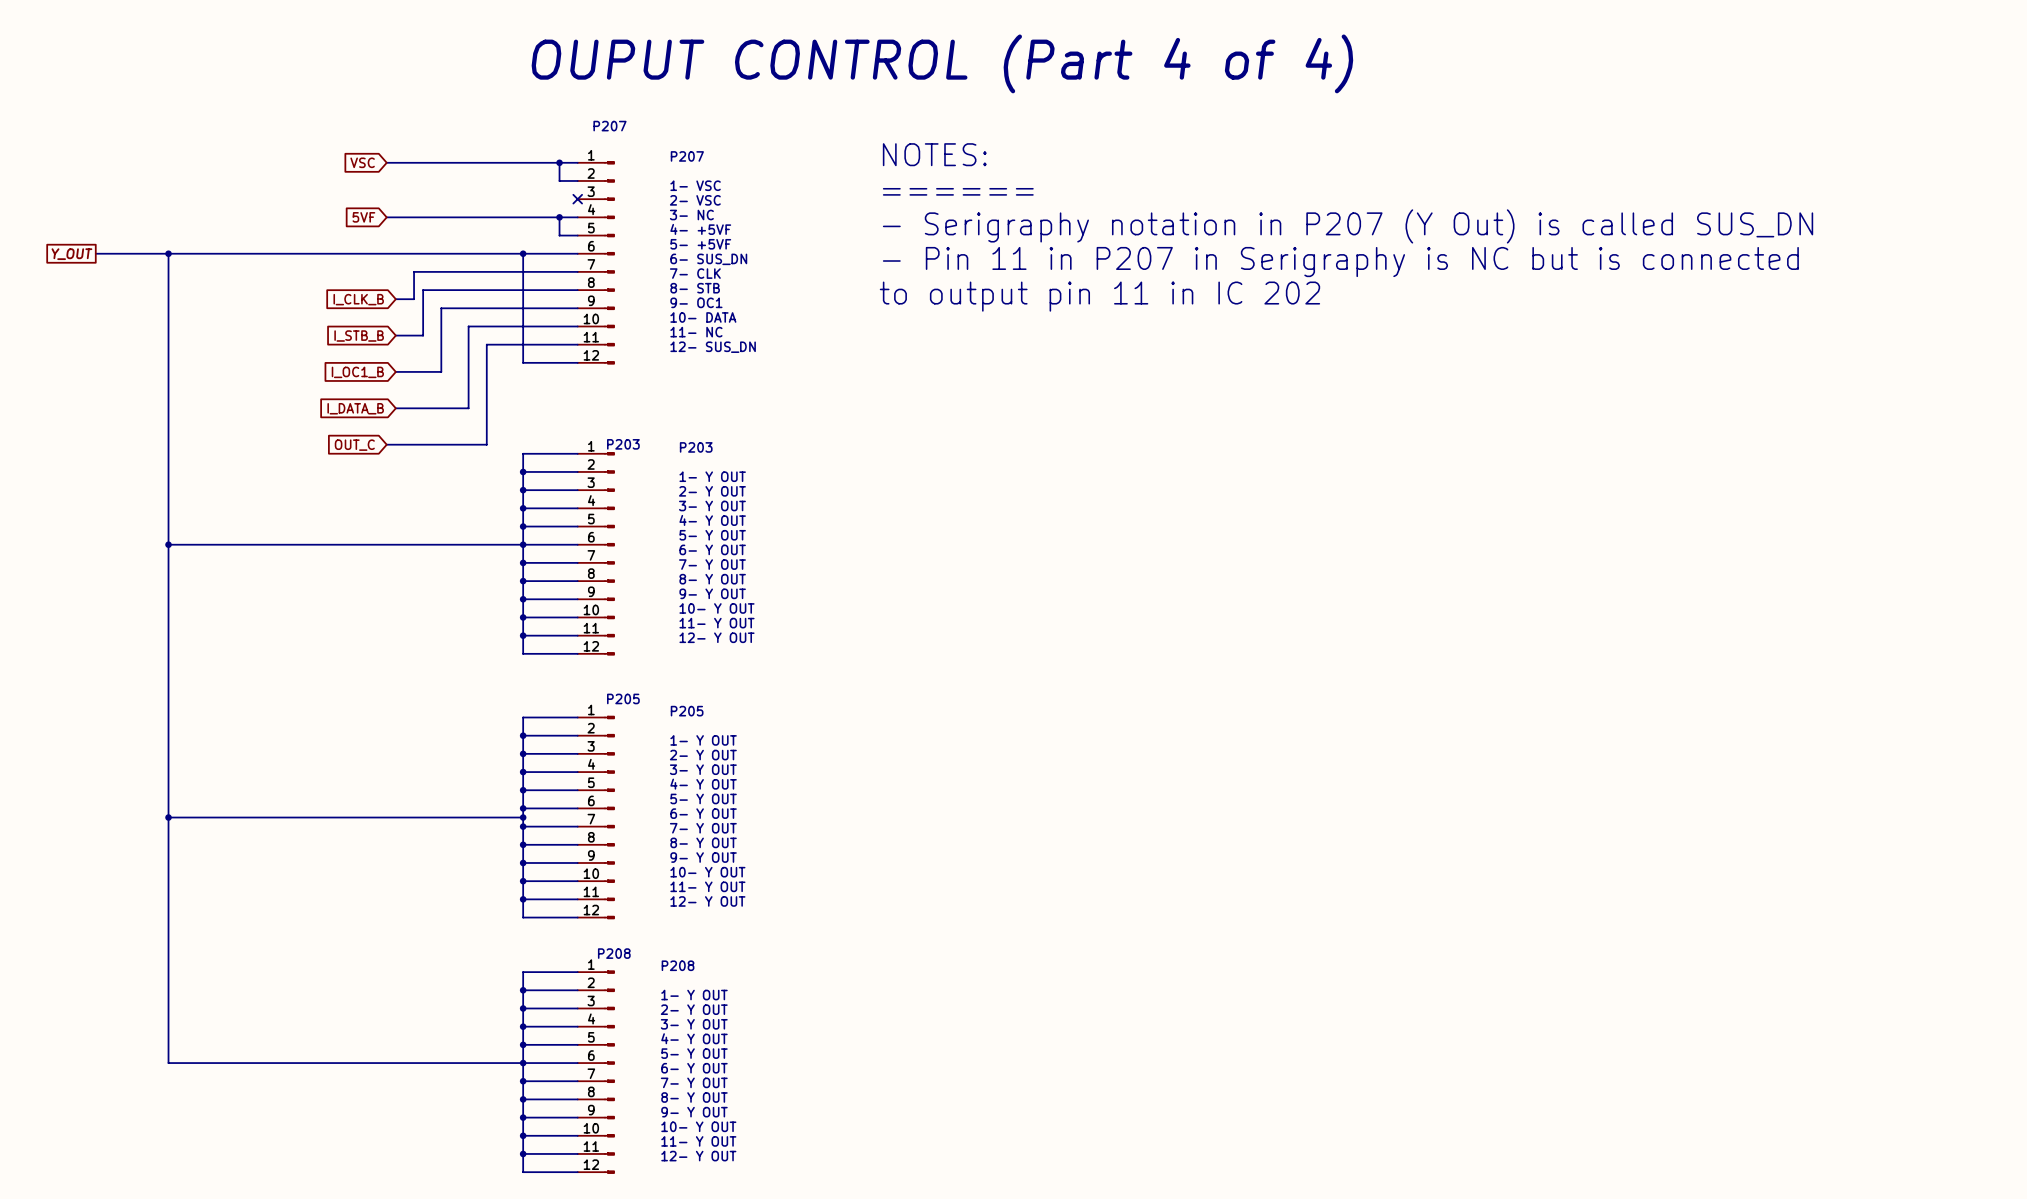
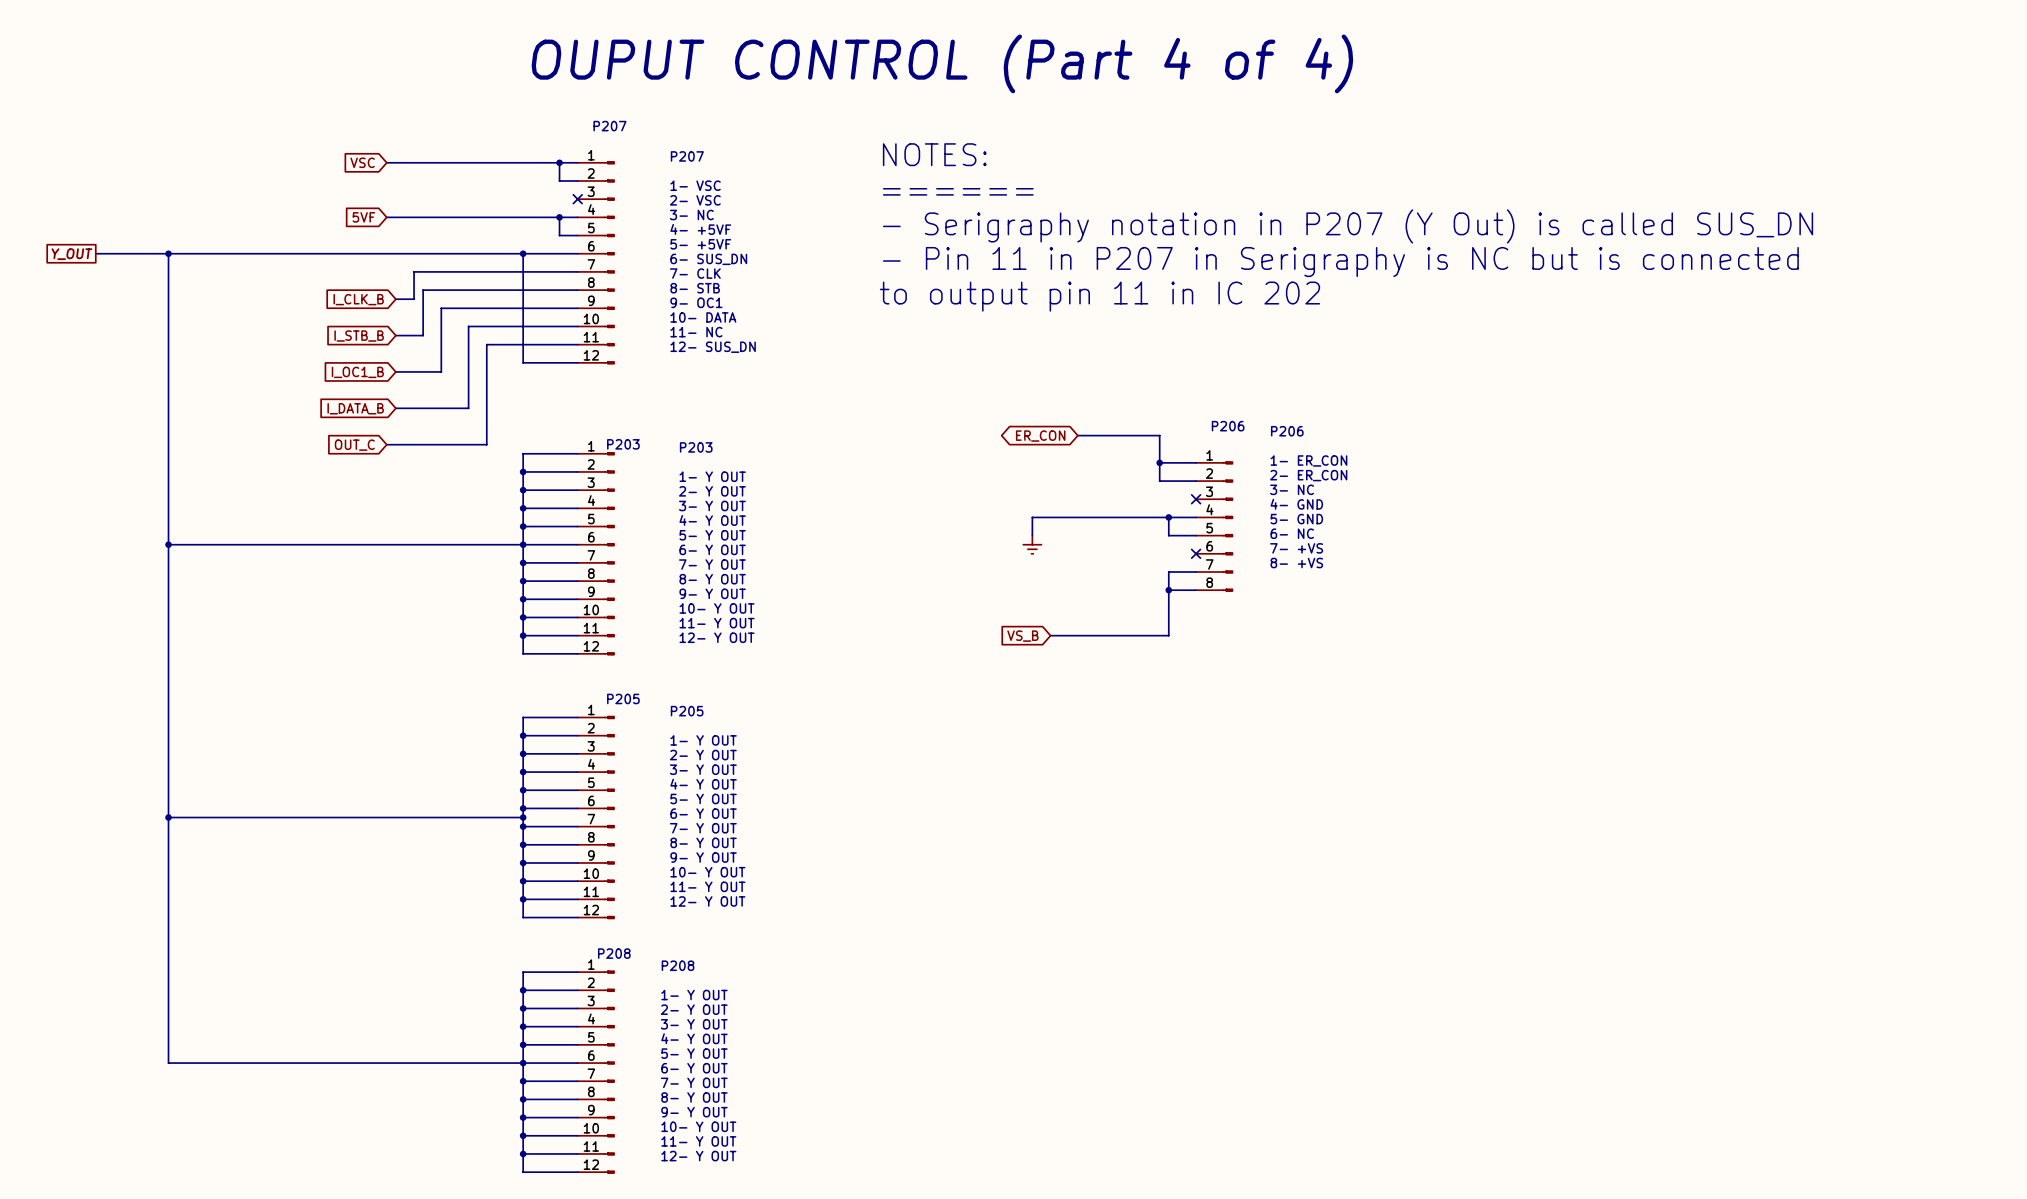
text: none -> P206 (1287, 431)
wire: none -> (1077, 435) (1159, 435) (1159, 481) (1196, 481)
global label: none -> ER_CON (1040, 436)
text: none -> 1- ER_CON (1308, 460)
wire: none -> (1159, 462) (1196, 462)
junction: none -> (1159, 462)
text: none -> 2- ER_CON (1308, 475)
text: none -> 3- NC (1292, 489)
no-connect mark: none -> (1196, 499)
text: none -> 4- GND (1296, 504)
wire: none -> (1168, 517) (1168, 535) (1196, 535)
junction: none -> (1168, 517)
wire: none -> (1196, 517) (1032, 517) (1032, 535)
text: none -> 5- GND (1296, 519)
P206: none -> (1214, 526)
text: none -> 6- NC (1292, 533)
power symbol: none -> (1032, 544)
text: none -> 7- +VS (1296, 548)
no-connect mark: none -> (1196, 553)
text: none -> 8- +VS (1296, 563)
wire: none -> (1196, 572) (1168, 572) (1168, 635) (1050, 635)
wire: none -> (1168, 590) (1196, 590)
junction: none -> (1168, 590)
global label: none -> VS_B (1022, 636)

